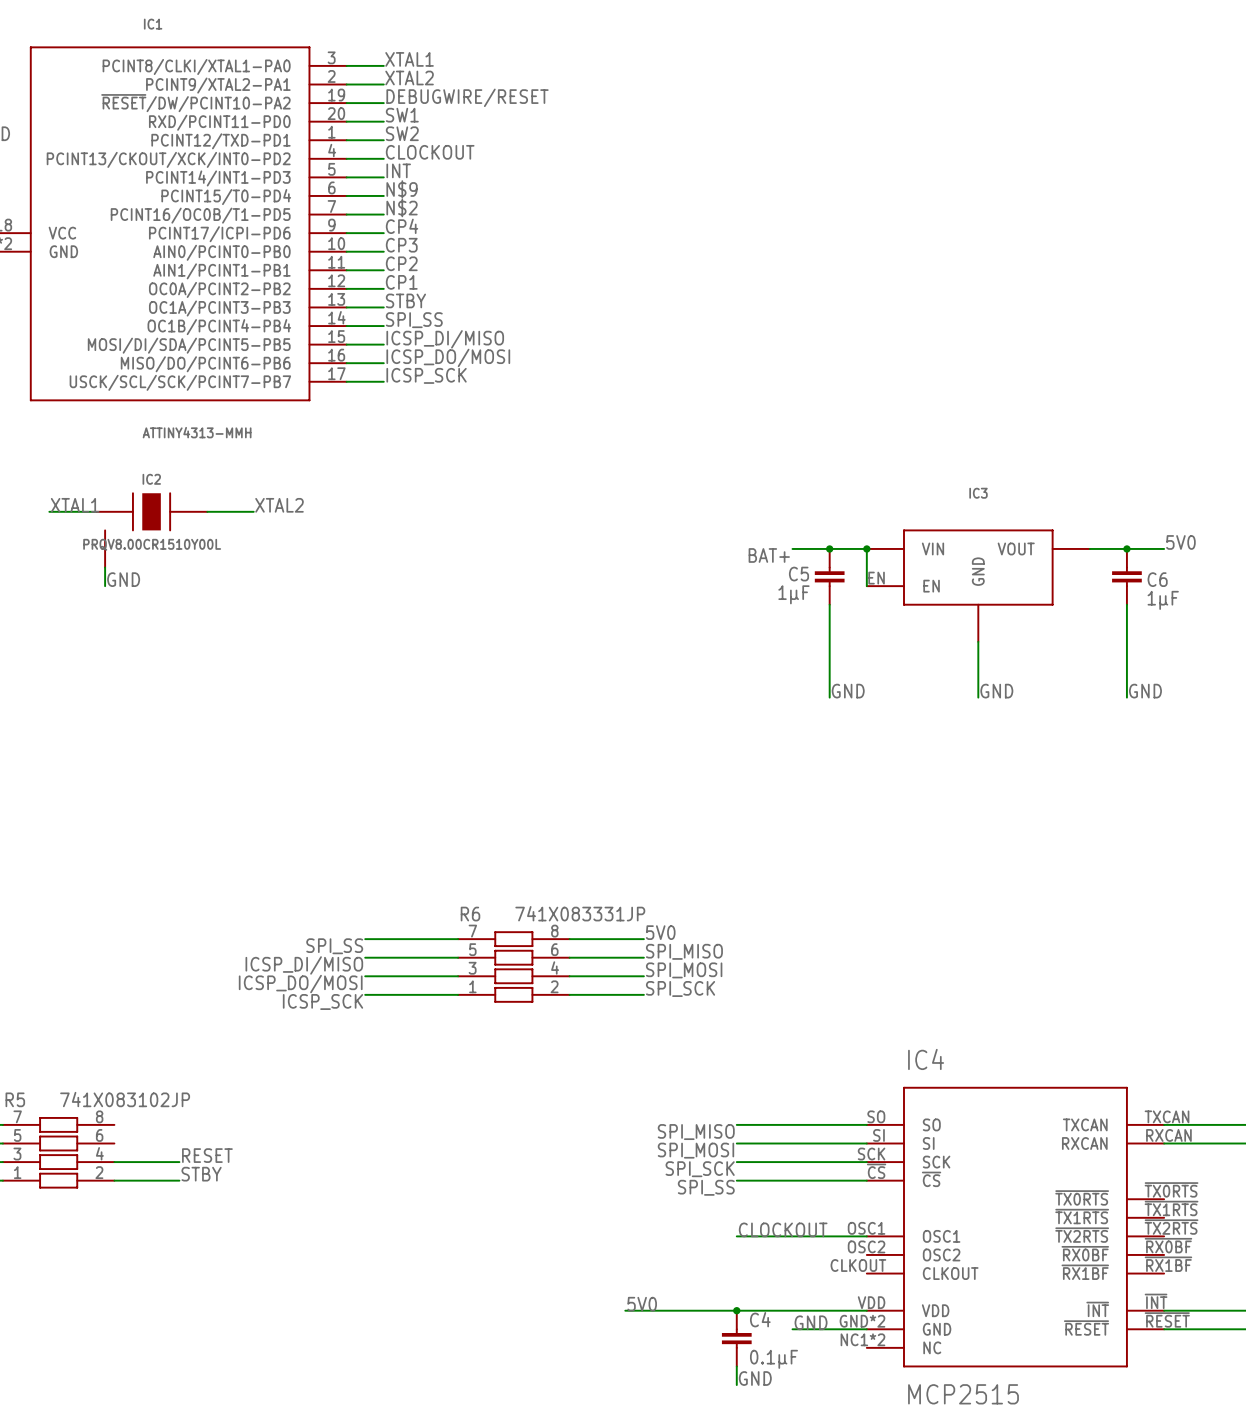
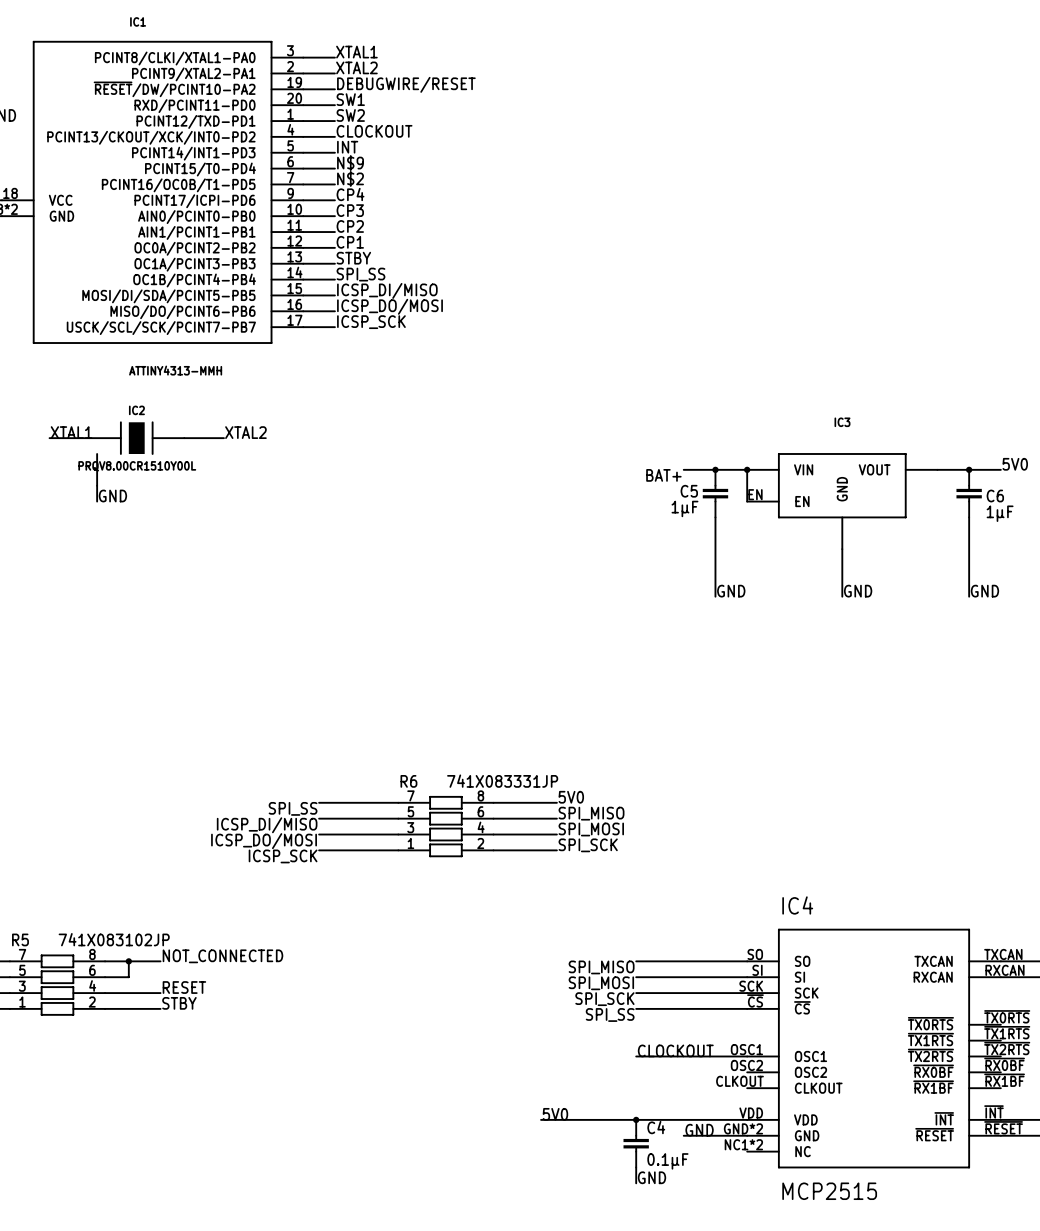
label: none -> NOT_CONNECTED (222, 956)
wire: none -> (105, 961) (160, 961)
wire: none -> (128, 961) (128, 977) (105, 977)
junction: none -> (128, 961)

